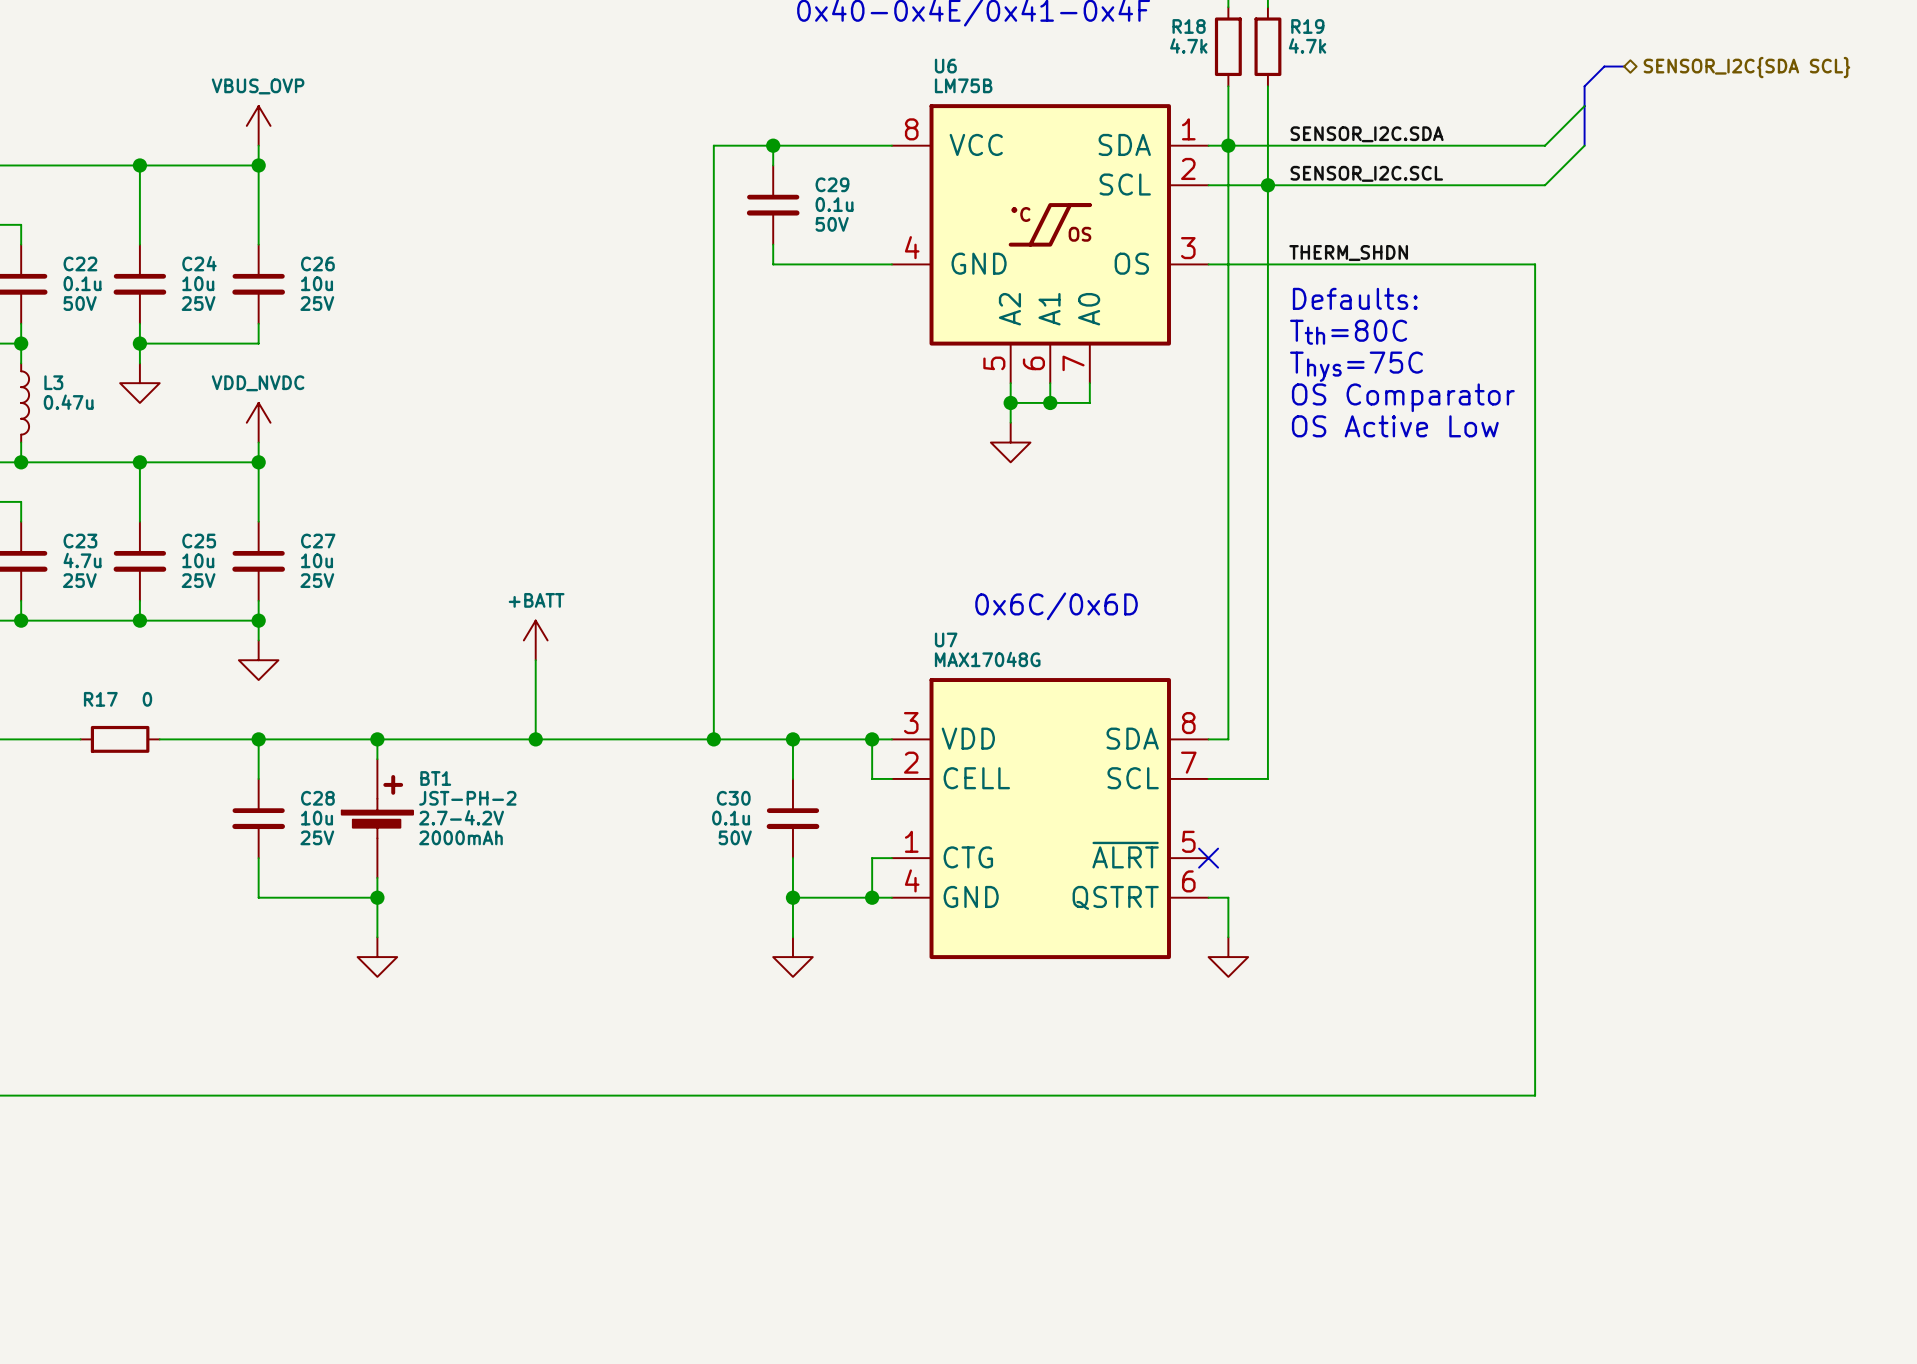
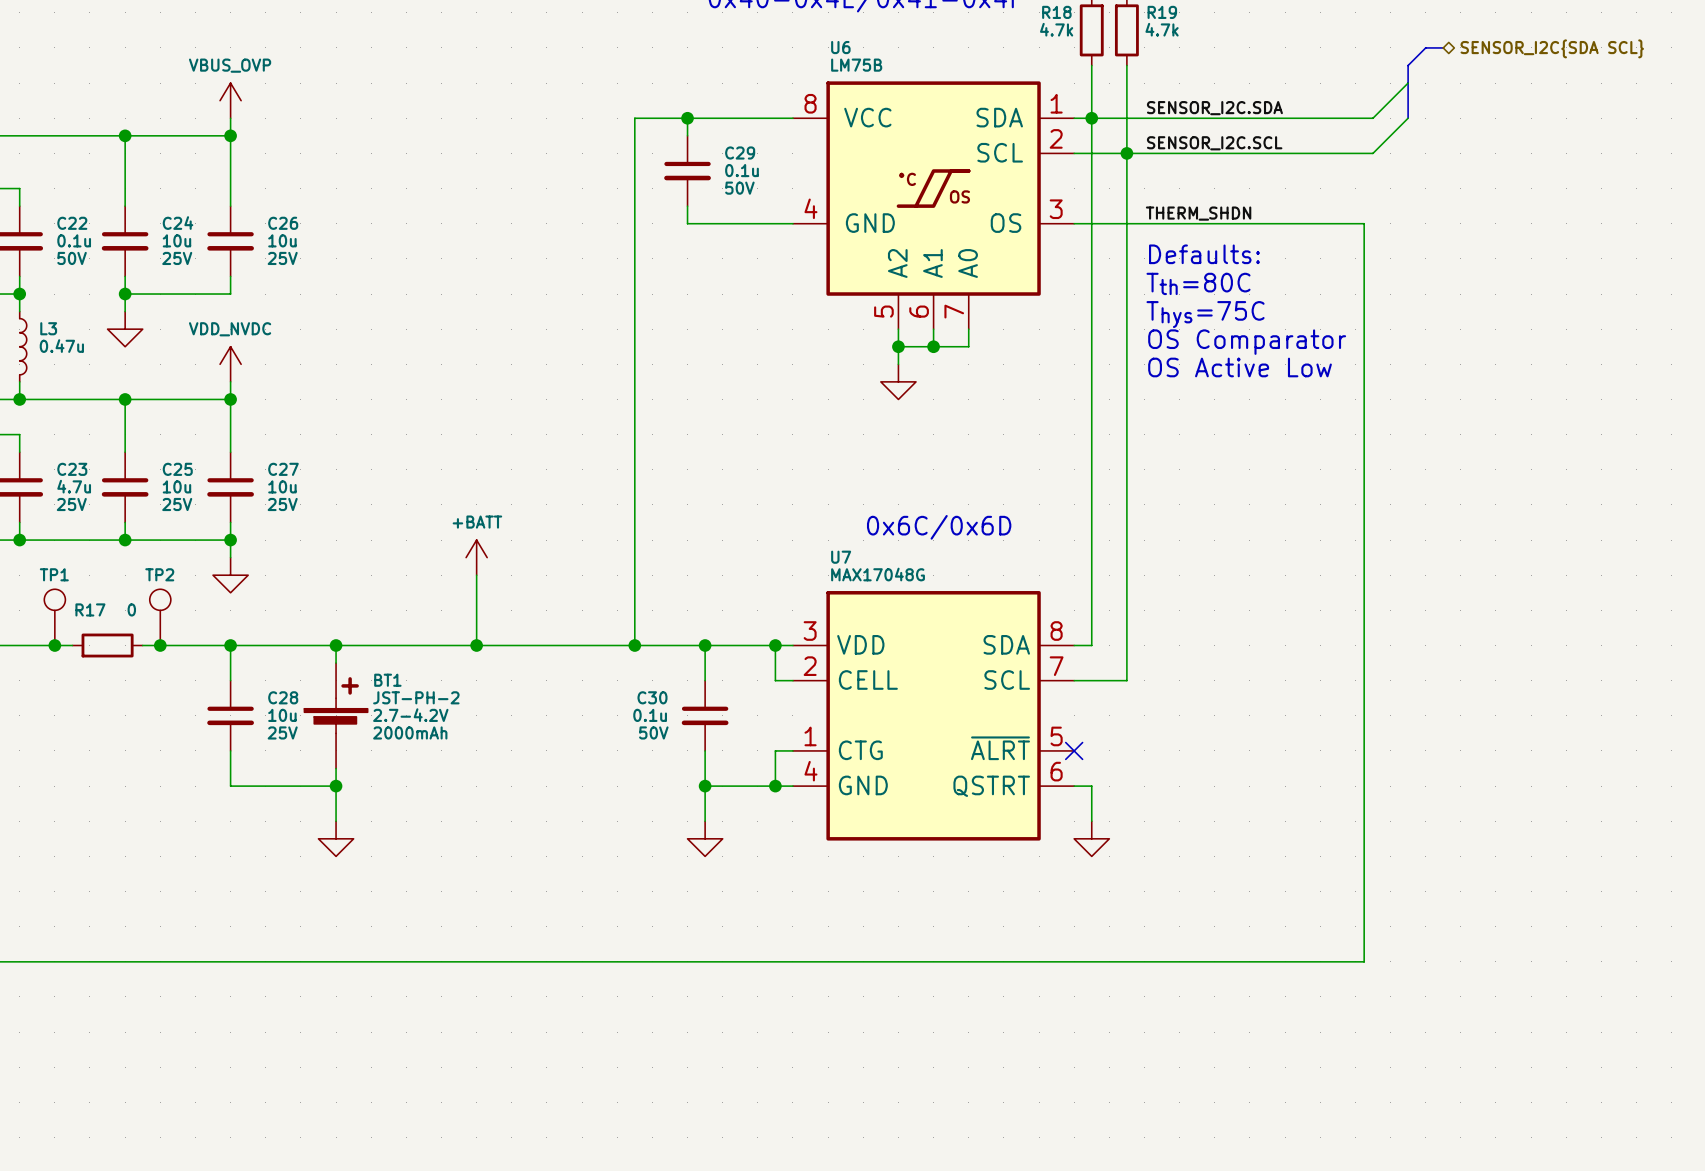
TP1: none -> (54, 617)
TP2: none -> (160, 617)
junction: none -> (54, 645)
junction: none -> (160, 645)

